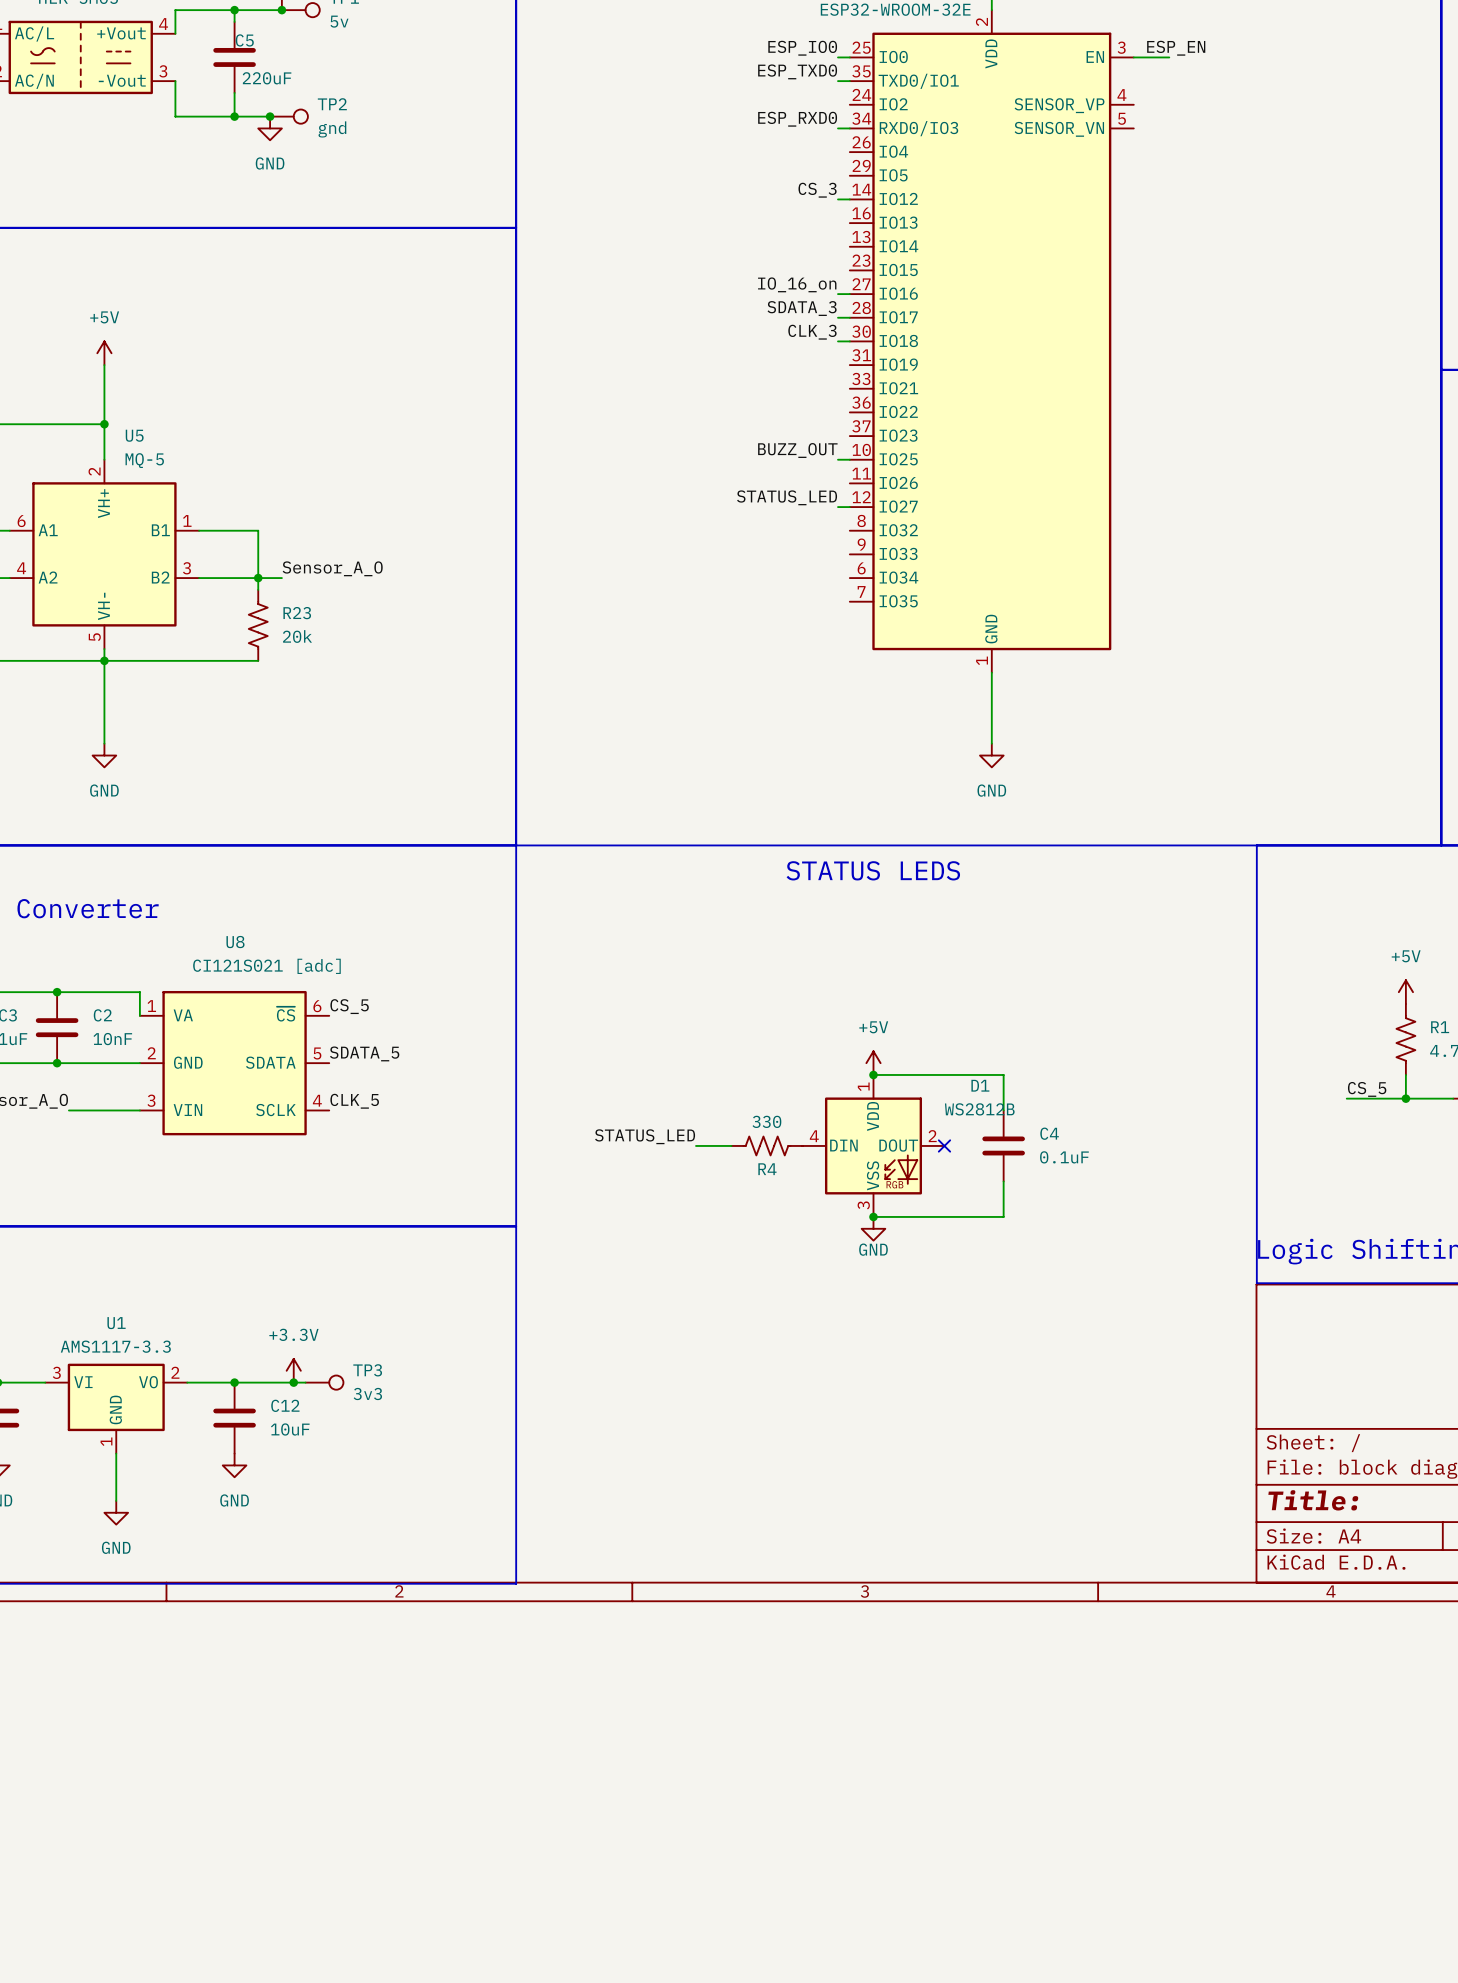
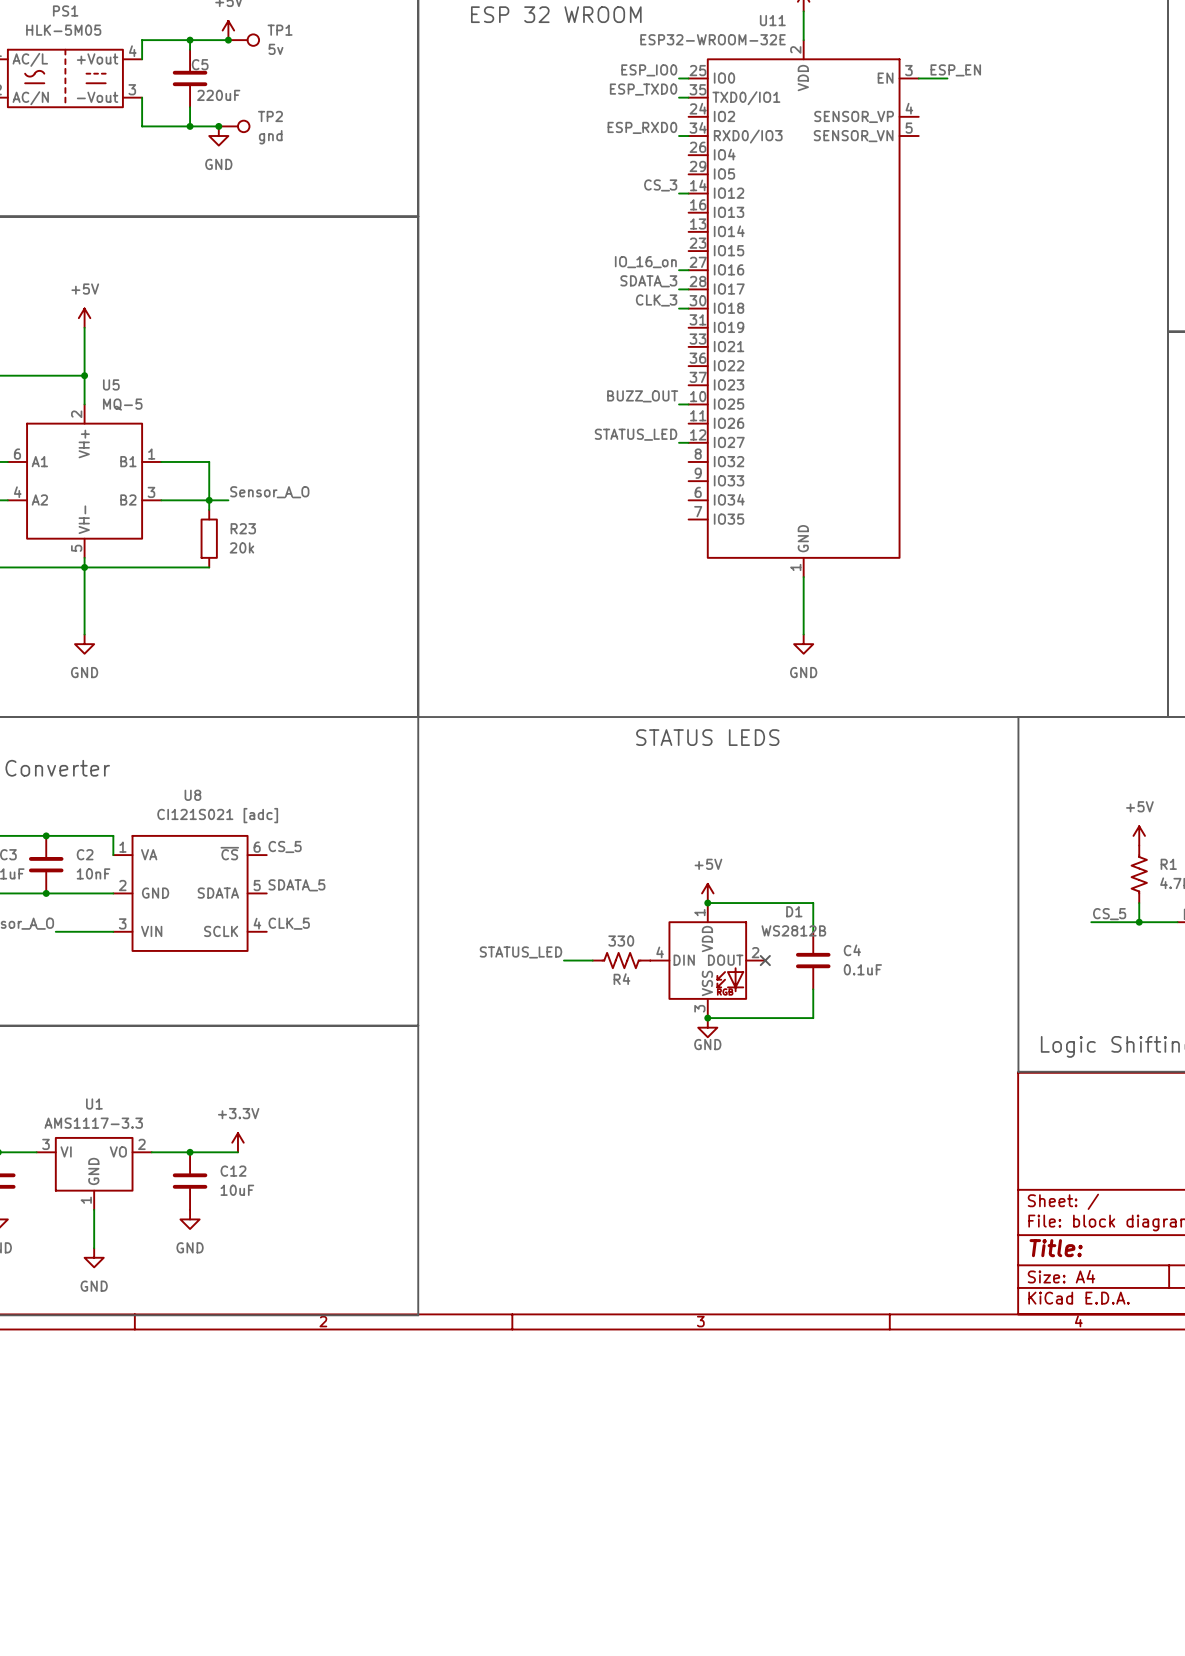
R23 symbol: [248, 589, 268, 661] -> [200, 509, 218, 568]
wire: (293, 1382) (305, 1382) -> none
junction: (293, 1382) -> none
TP3: 3v3 (324, 1382) -> none

